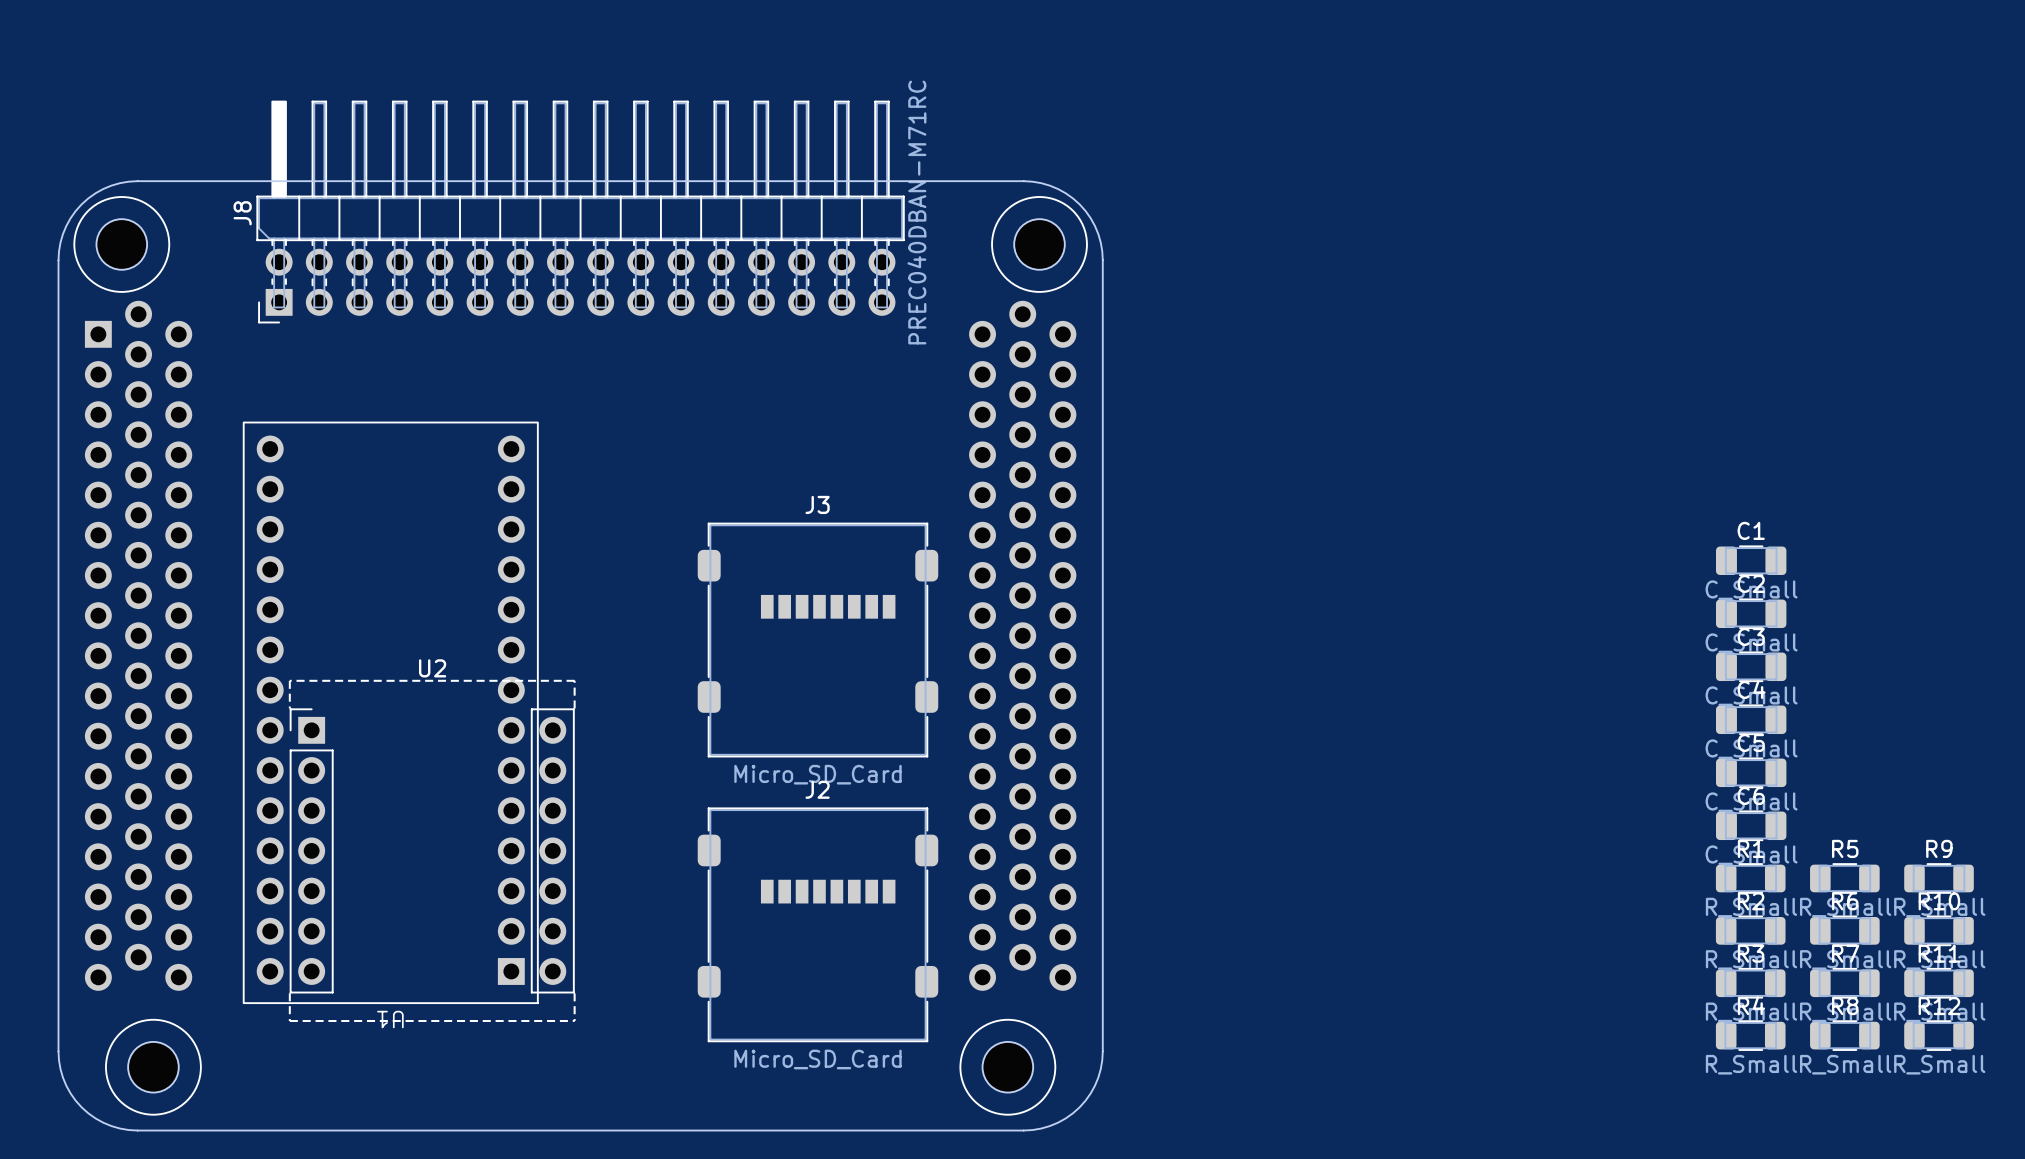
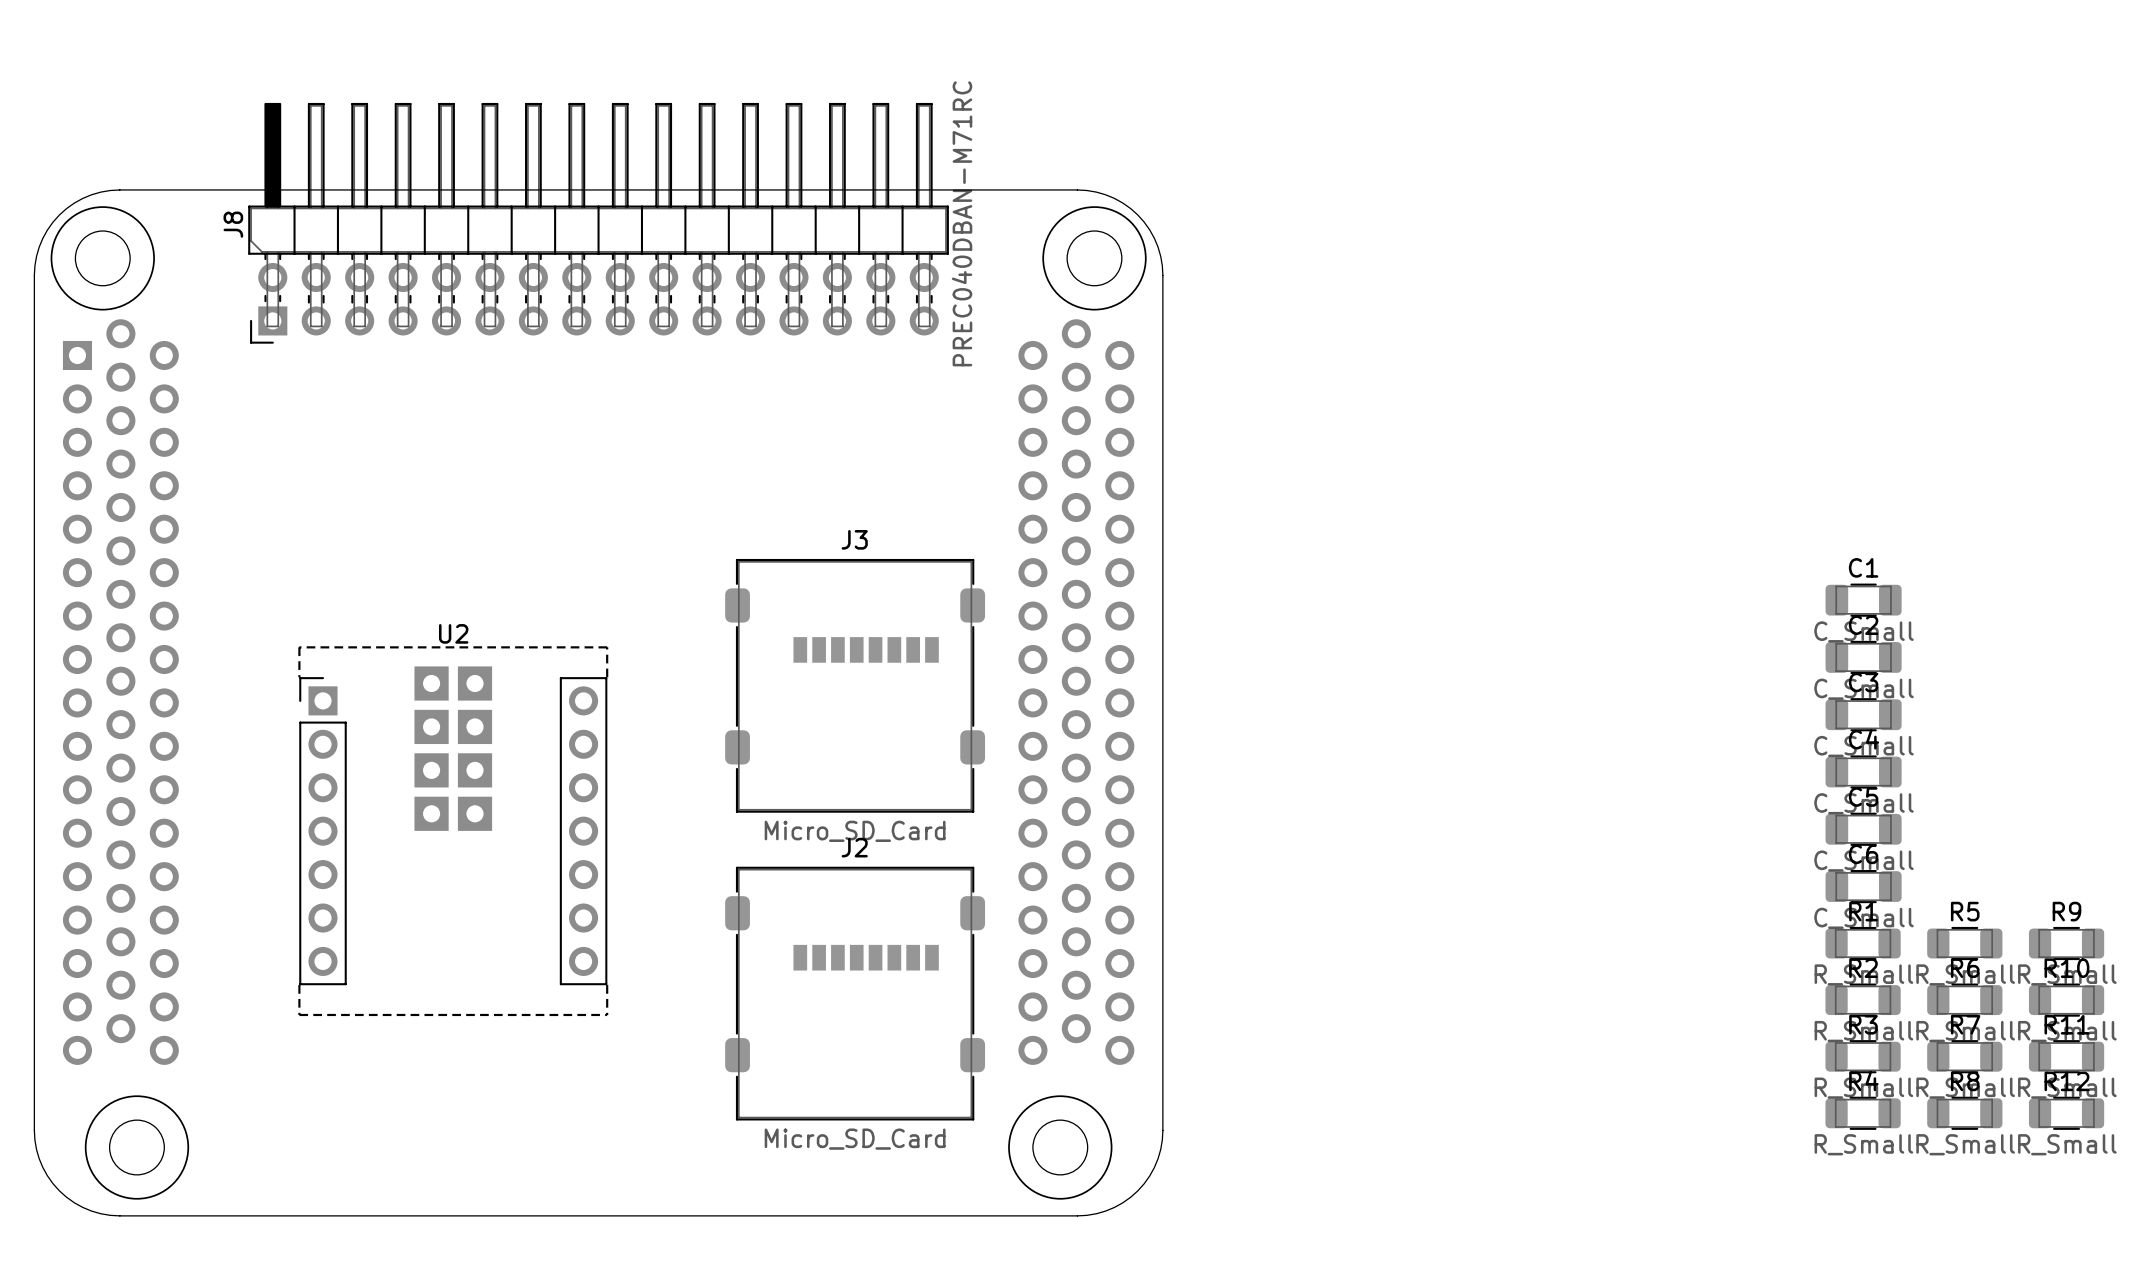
U2 footprint: [288, 679, 576, 1023] -> [298, 646, 609, 1017]
U1: (390, 712) -> none

